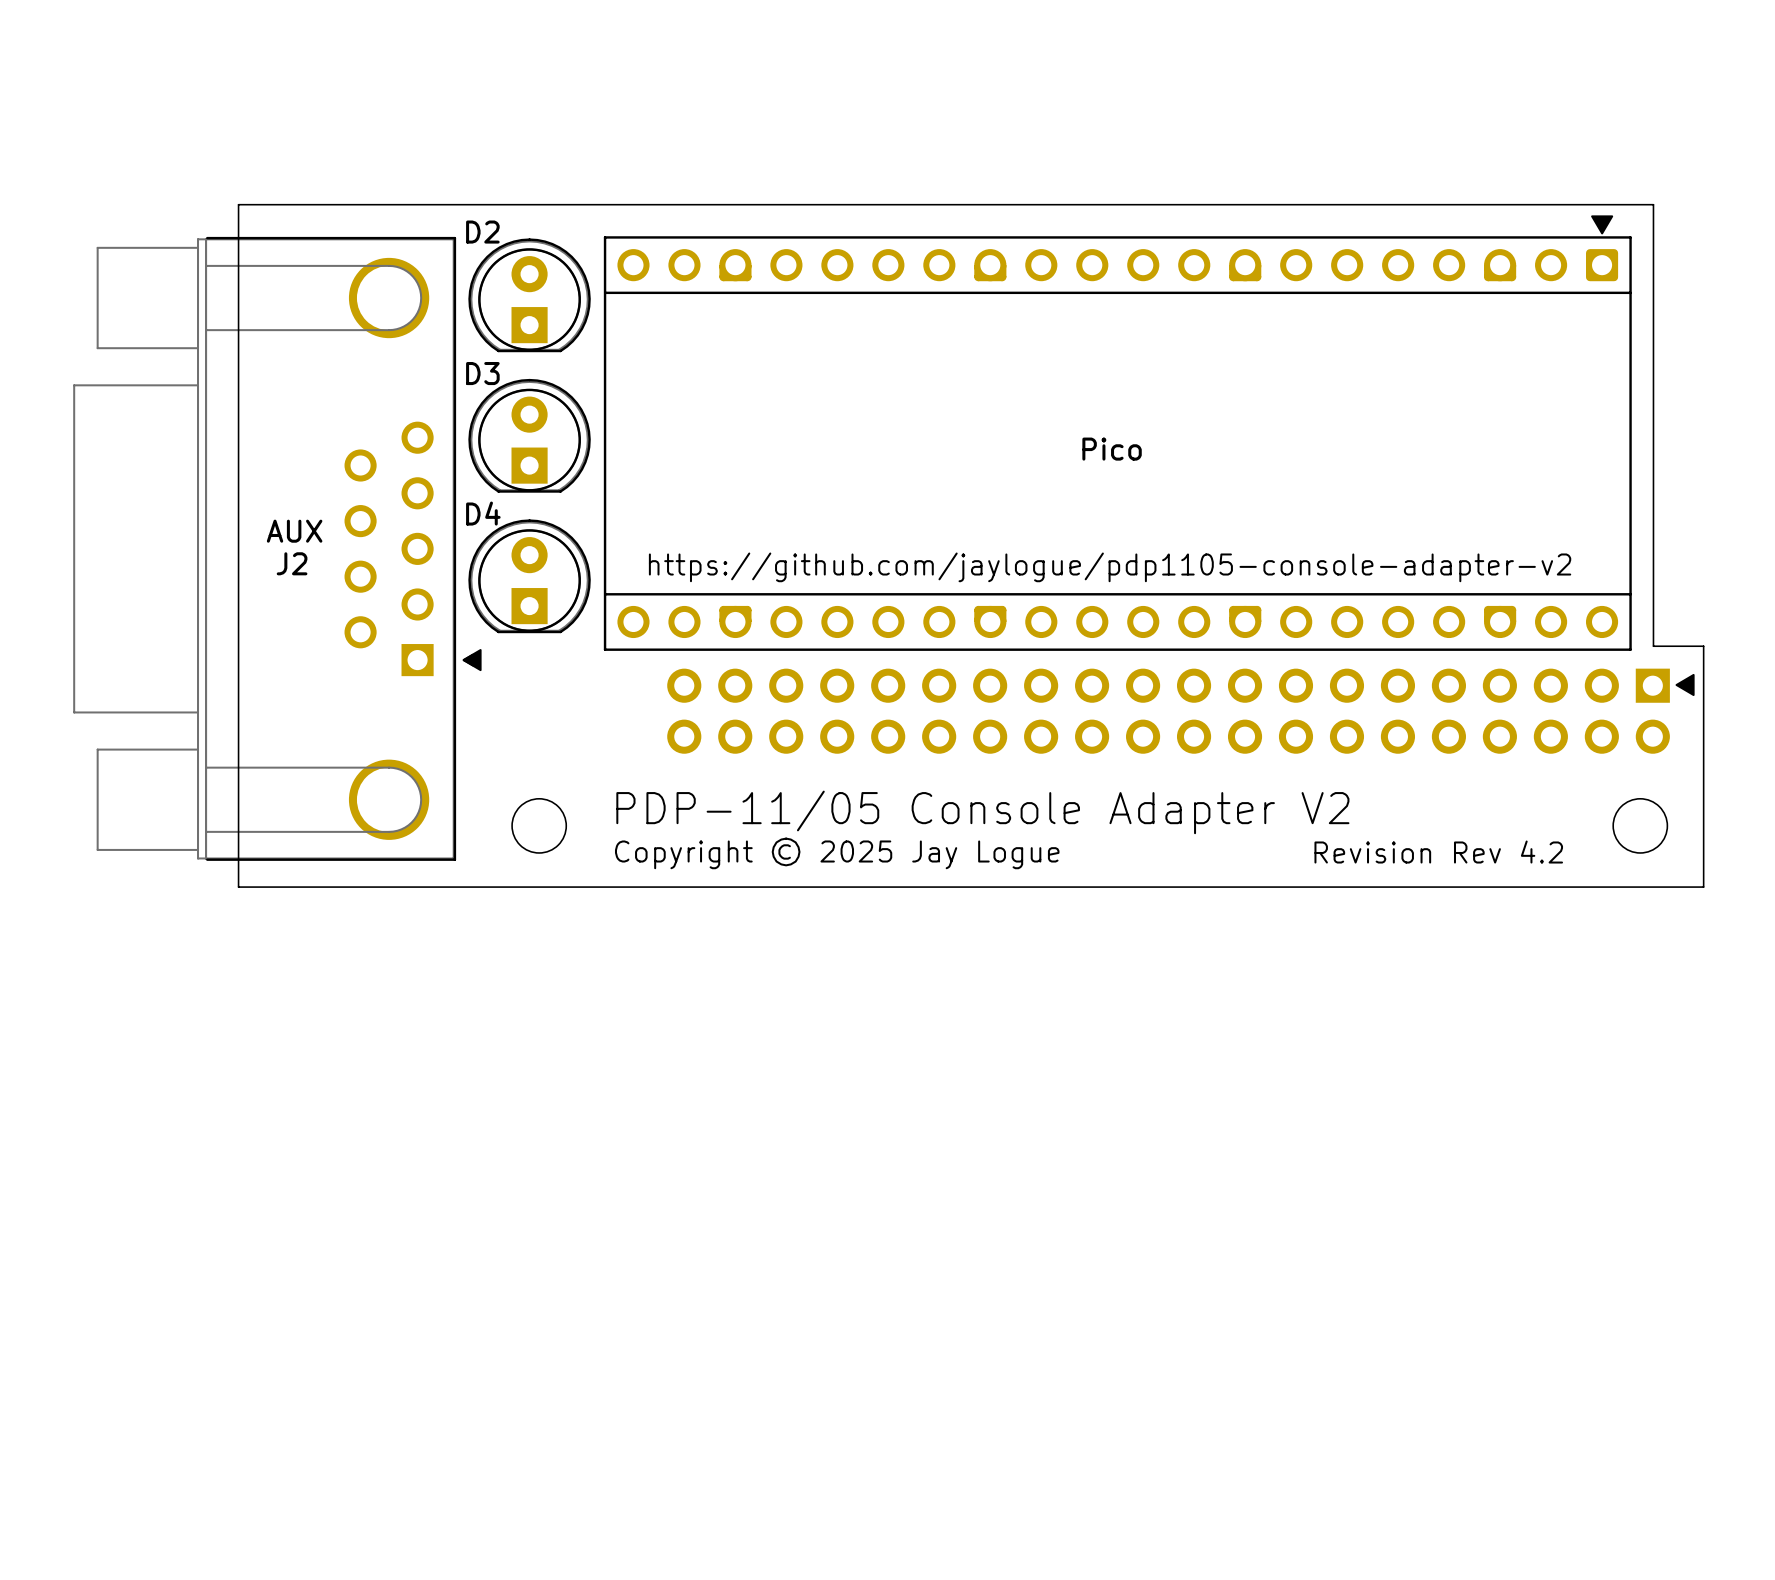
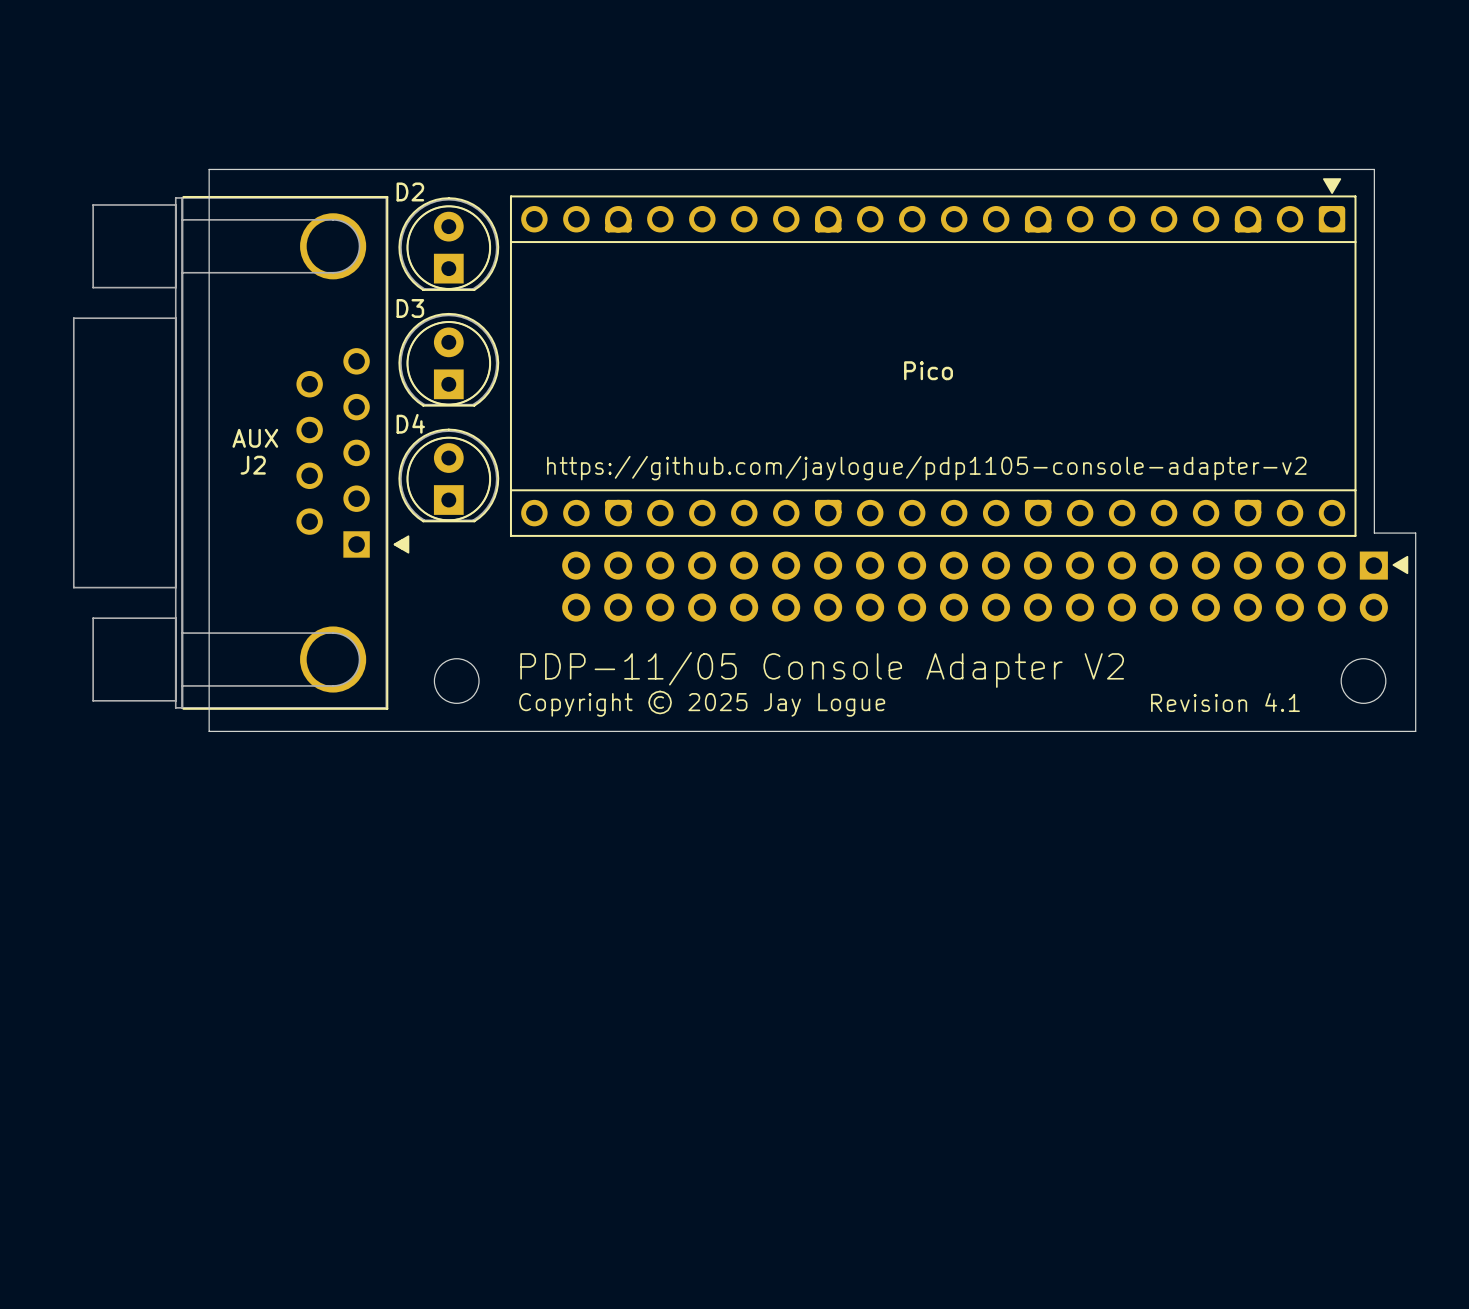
text: Revision Rev 4.2 (1438, 852) -> Revision 4.1 (1225, 702)

